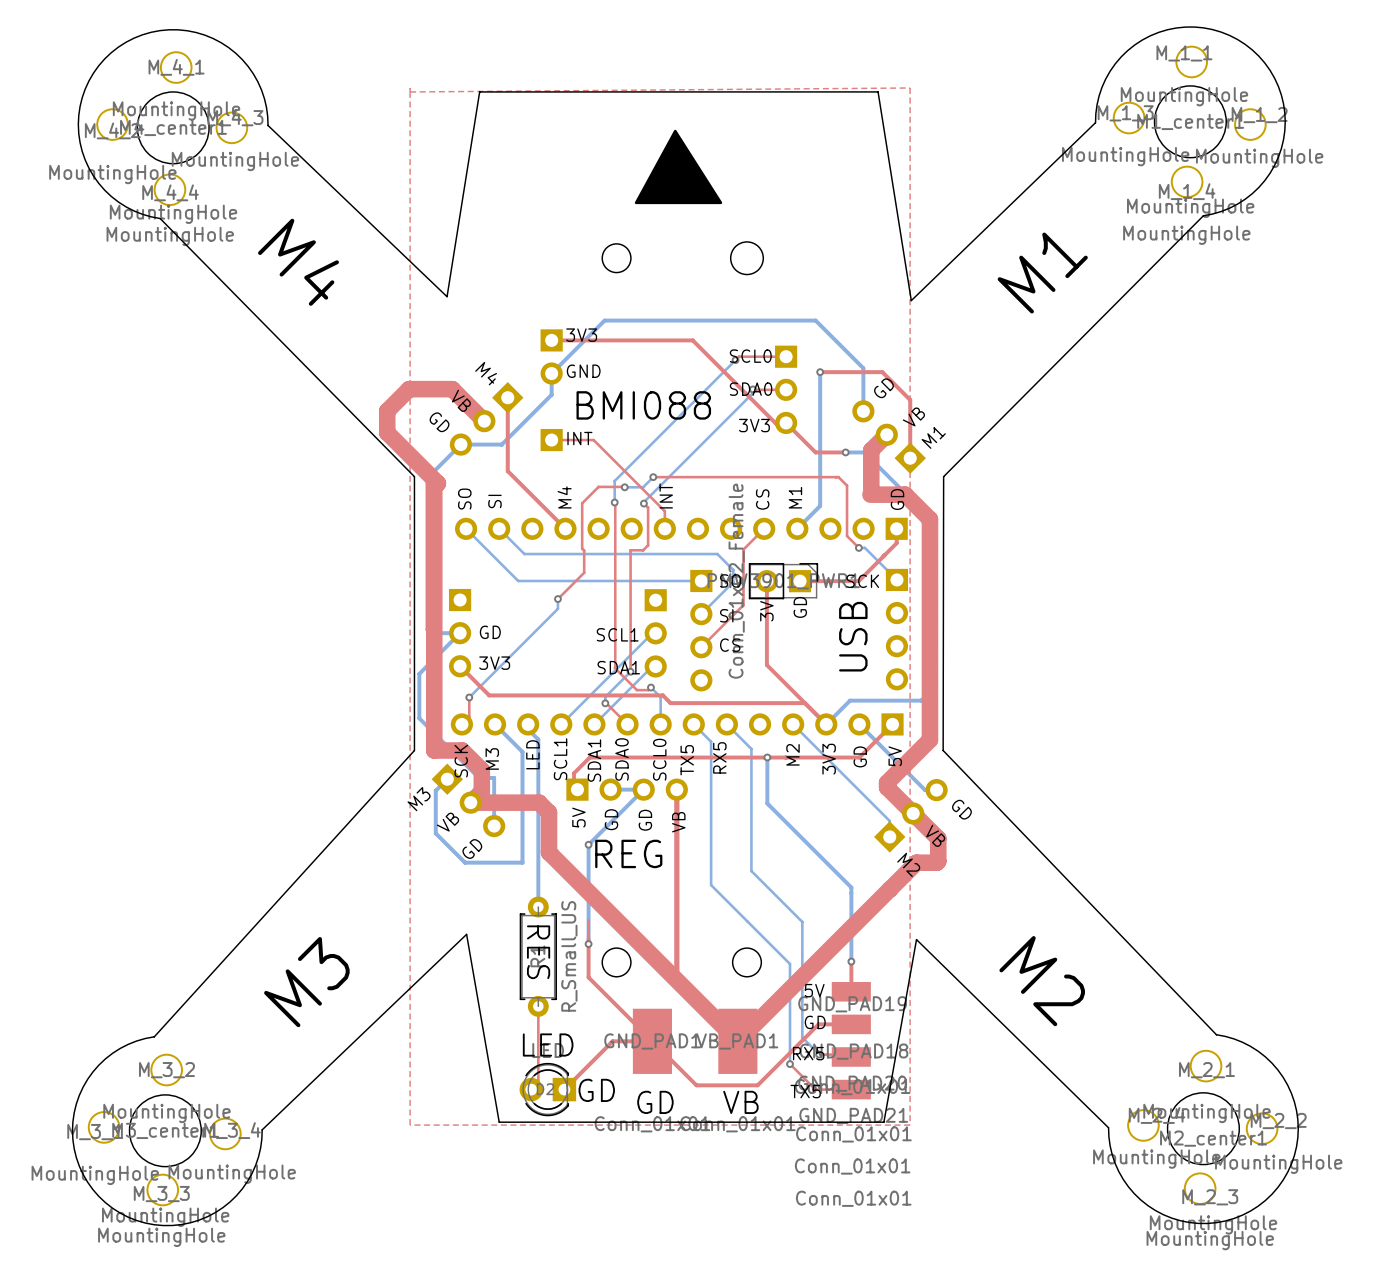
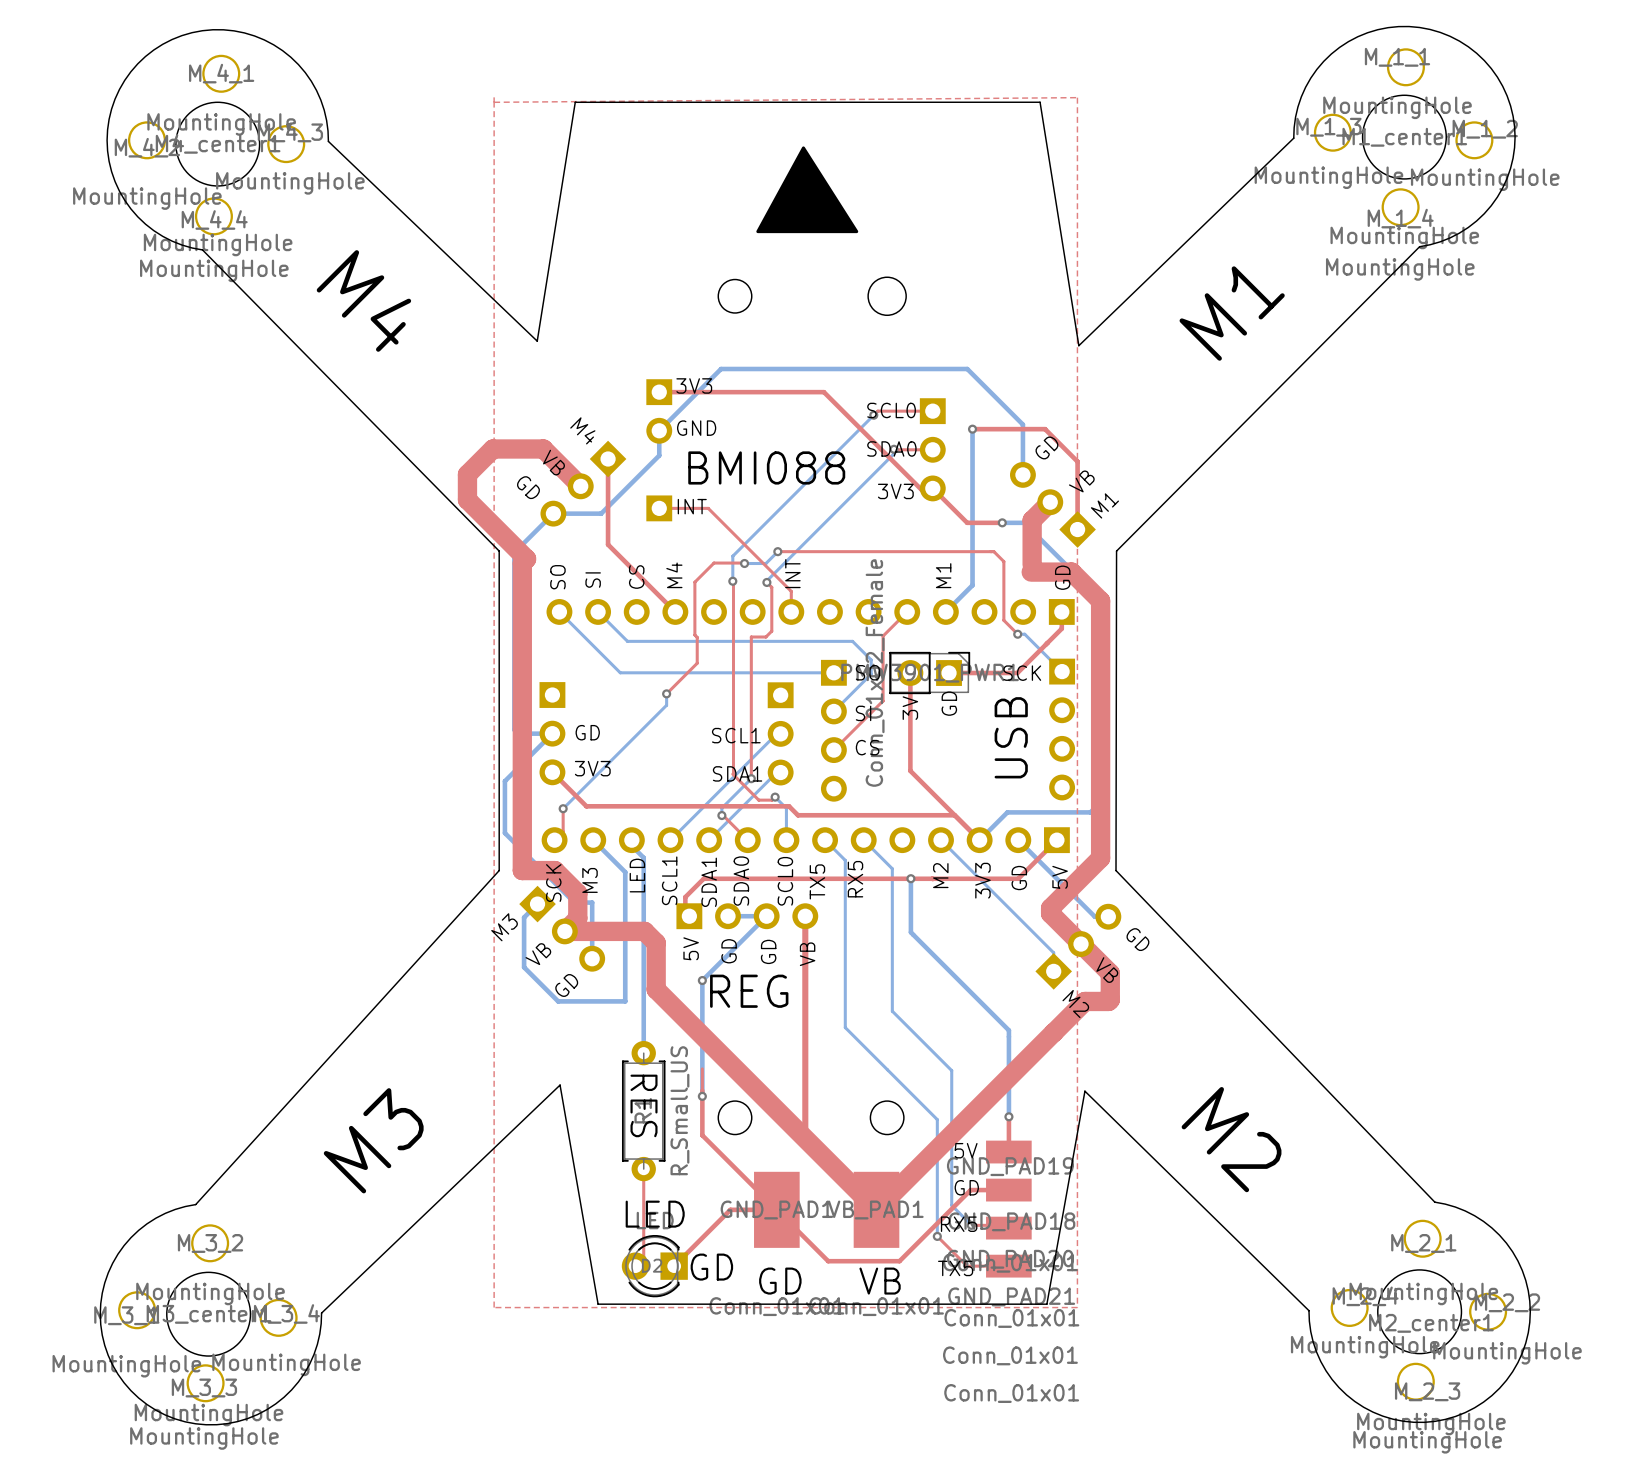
text position: CS (762, 499) -> CS (636, 577)

